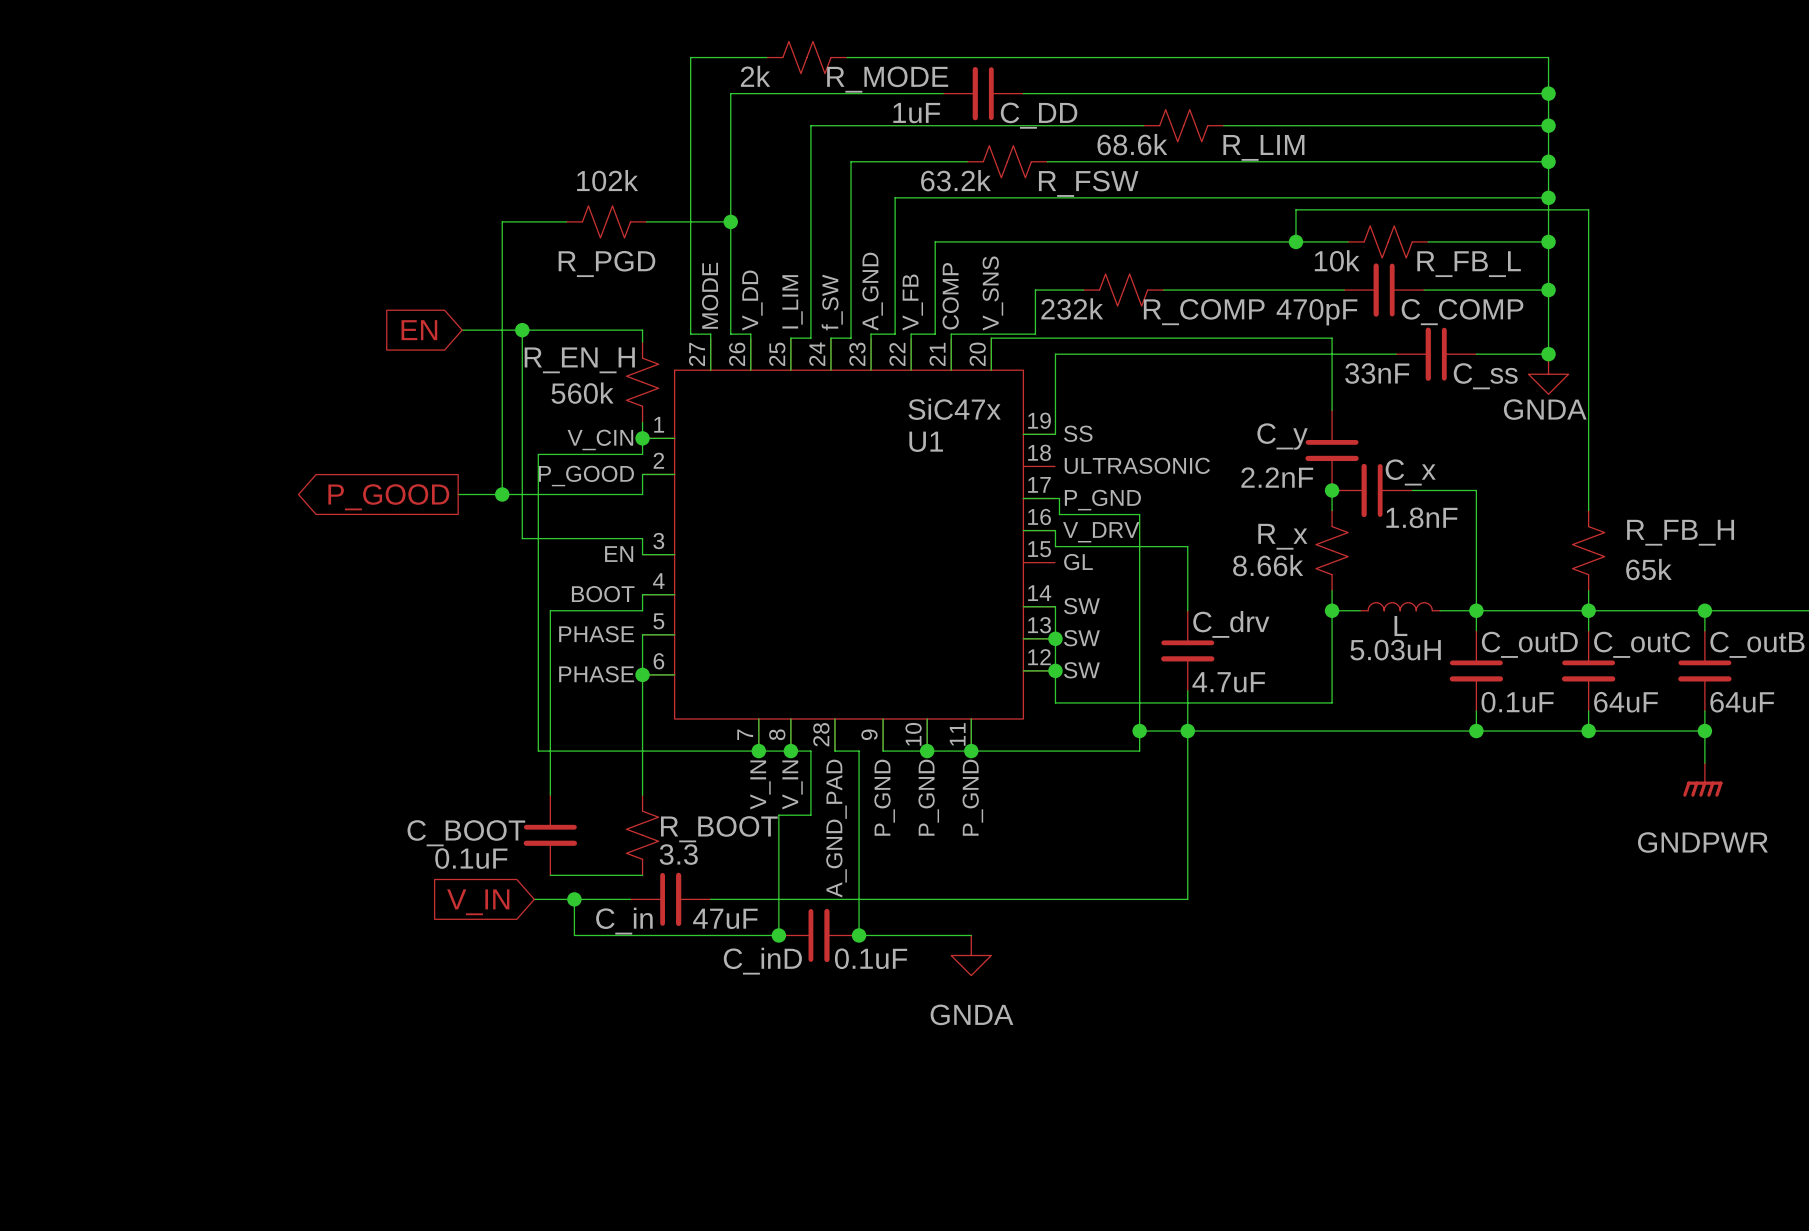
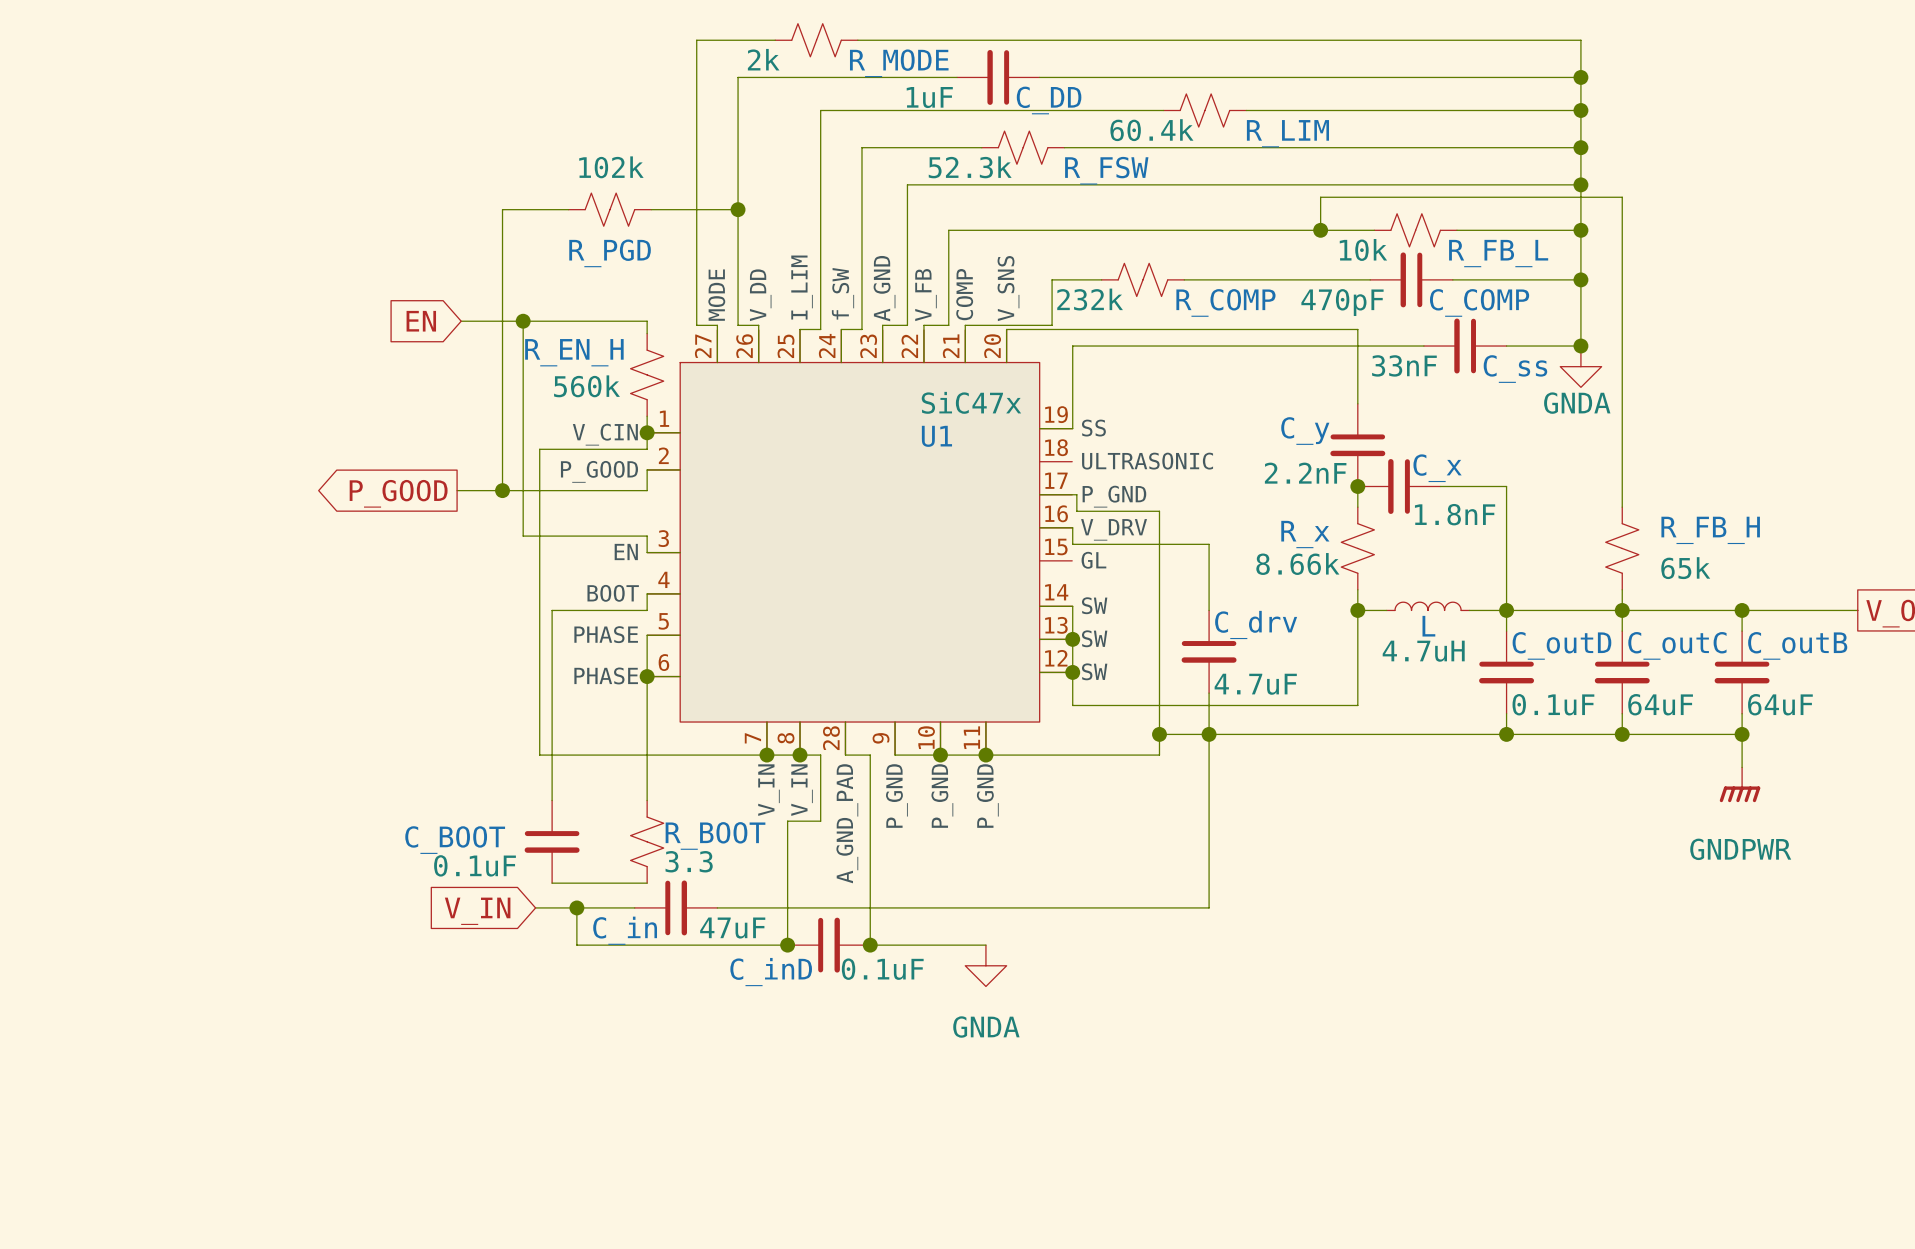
R_LIM value: 68.6k (1132, 144) -> 60.4k (1151, 130)
R_FSW value: 63.2k (956, 180) -> 52.3k (970, 167)
L value: 5.03uH (1395, 650) -> 4.7uH (1423, 651)

